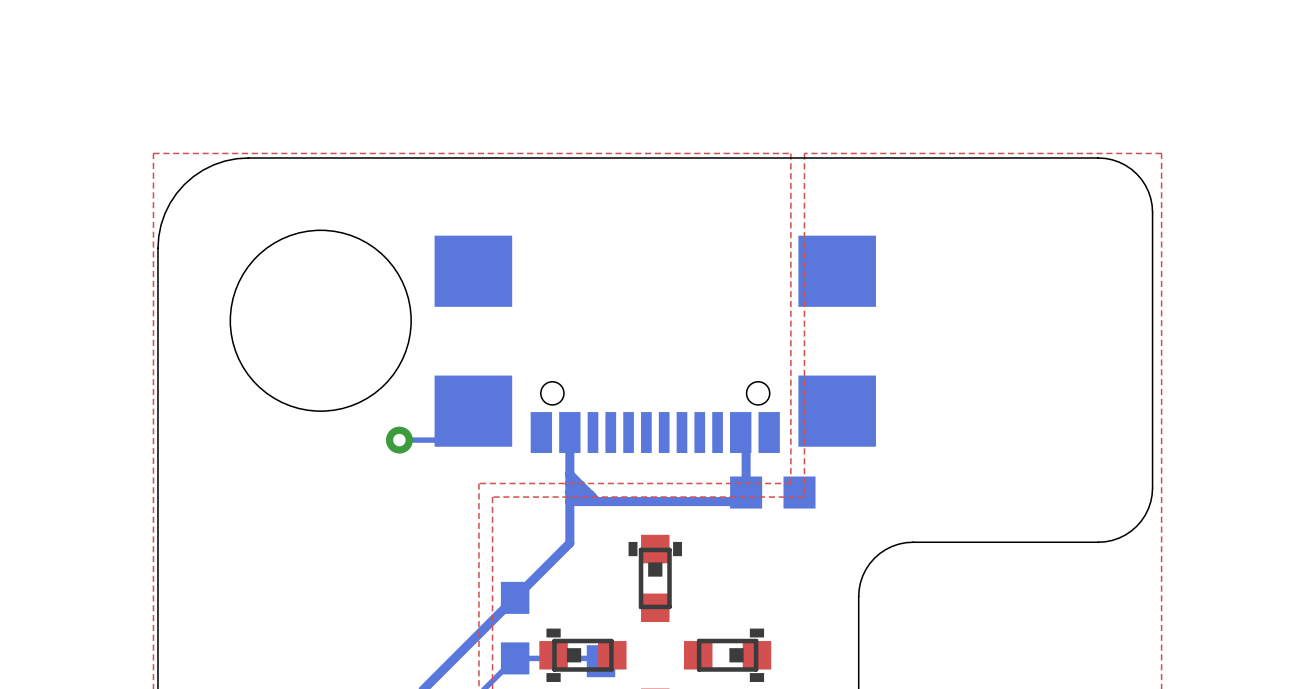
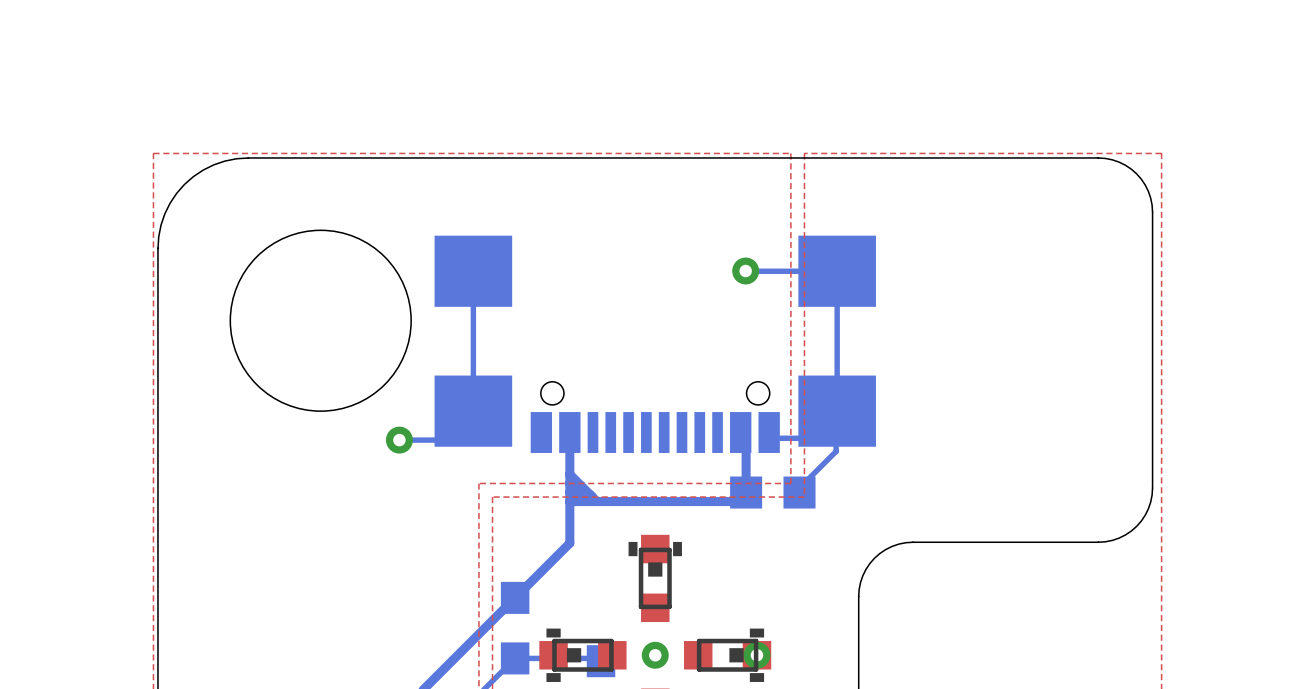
bottom track: none -> (473, 271) (473, 411)
bottom track: none -> (745, 271) (837, 271) (837, 411)
via: none -> (745, 271)
bottom track: none -> (769, 432) (774, 438) (836, 438) (836, 451) (799, 488) (799, 492)
via: none -> (655, 655)
via: none -> (756, 655)

